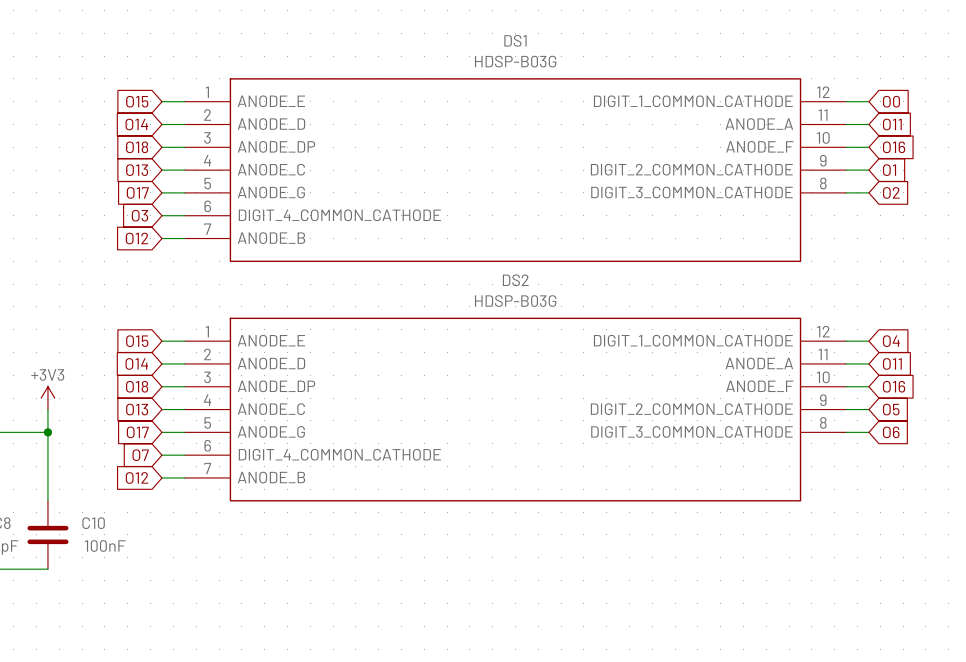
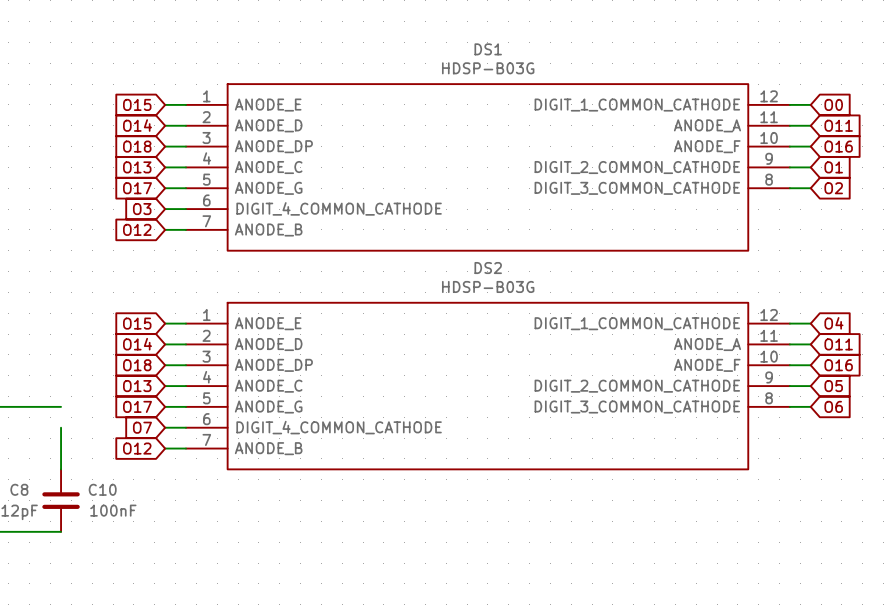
power symbol: +3V3 (47, 398) -> none
wire: (47, 409) (47, 455) -> none
junction: (47, 432) -> none

